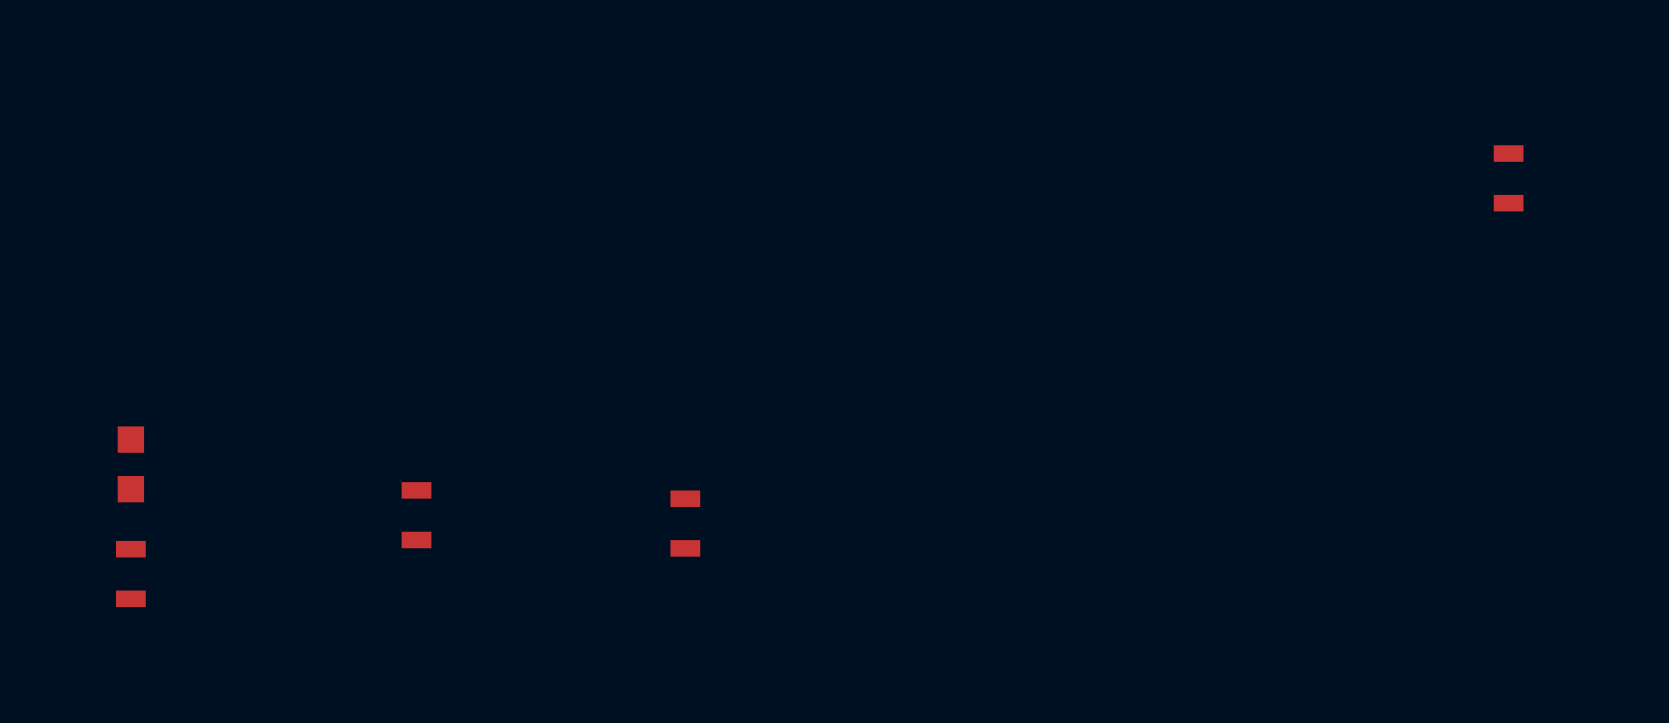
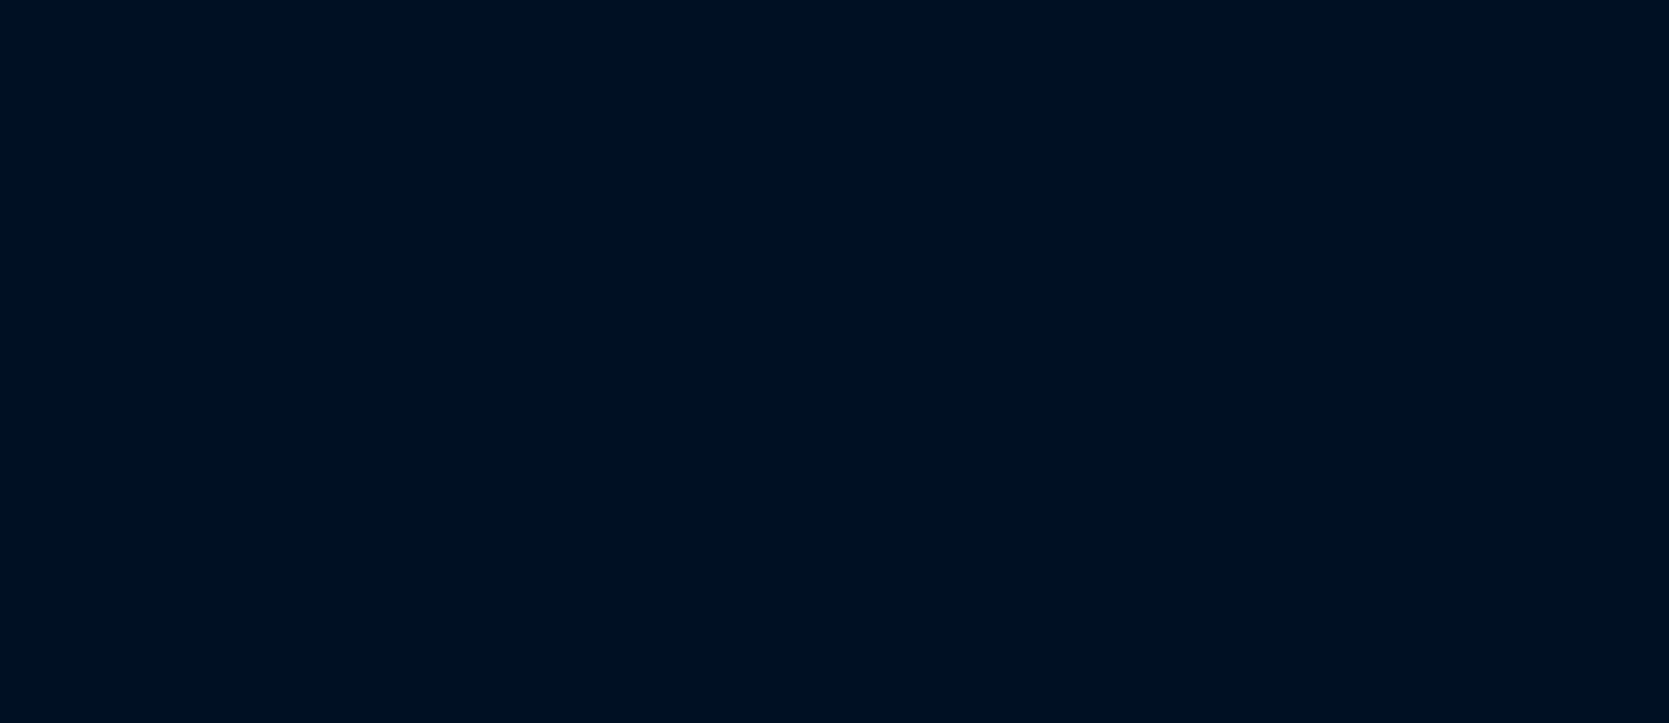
part: (1508, 178) -> none
part: (130, 464) -> none
part: (416, 515) -> none
part: (685, 523) -> none
part: (130, 573) -> none

